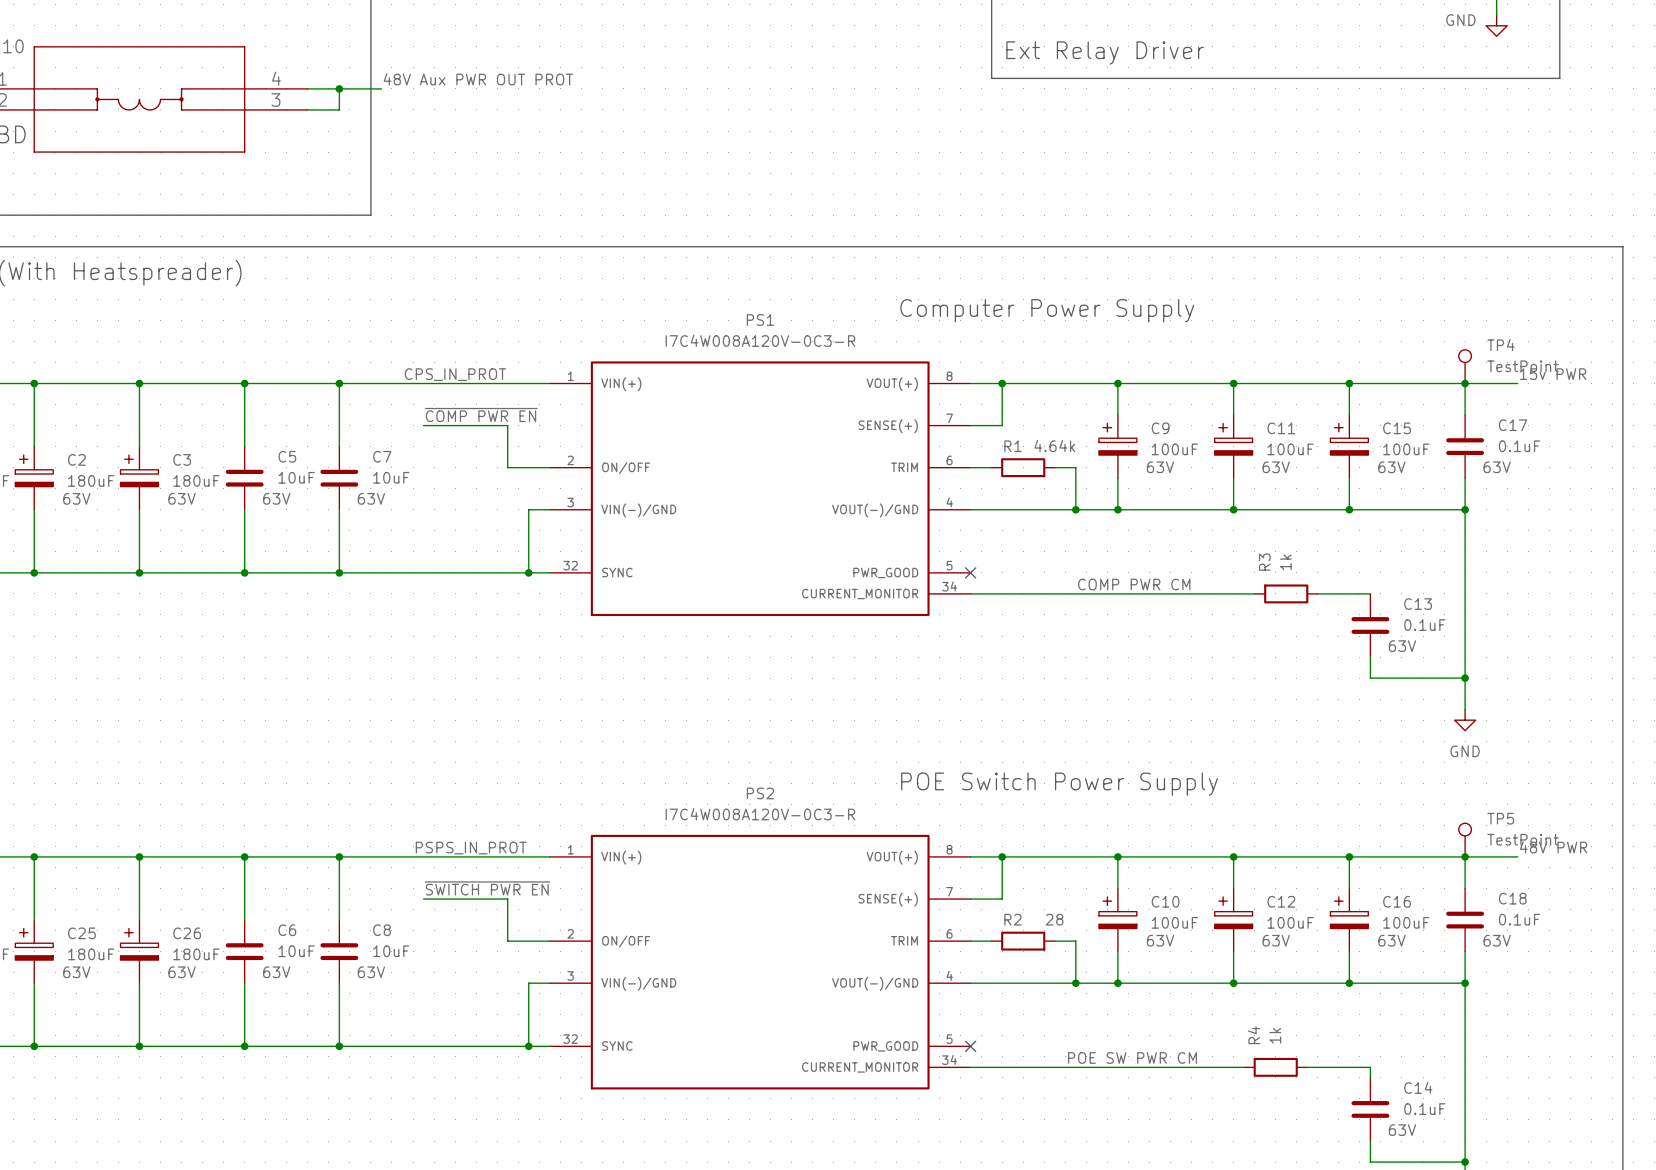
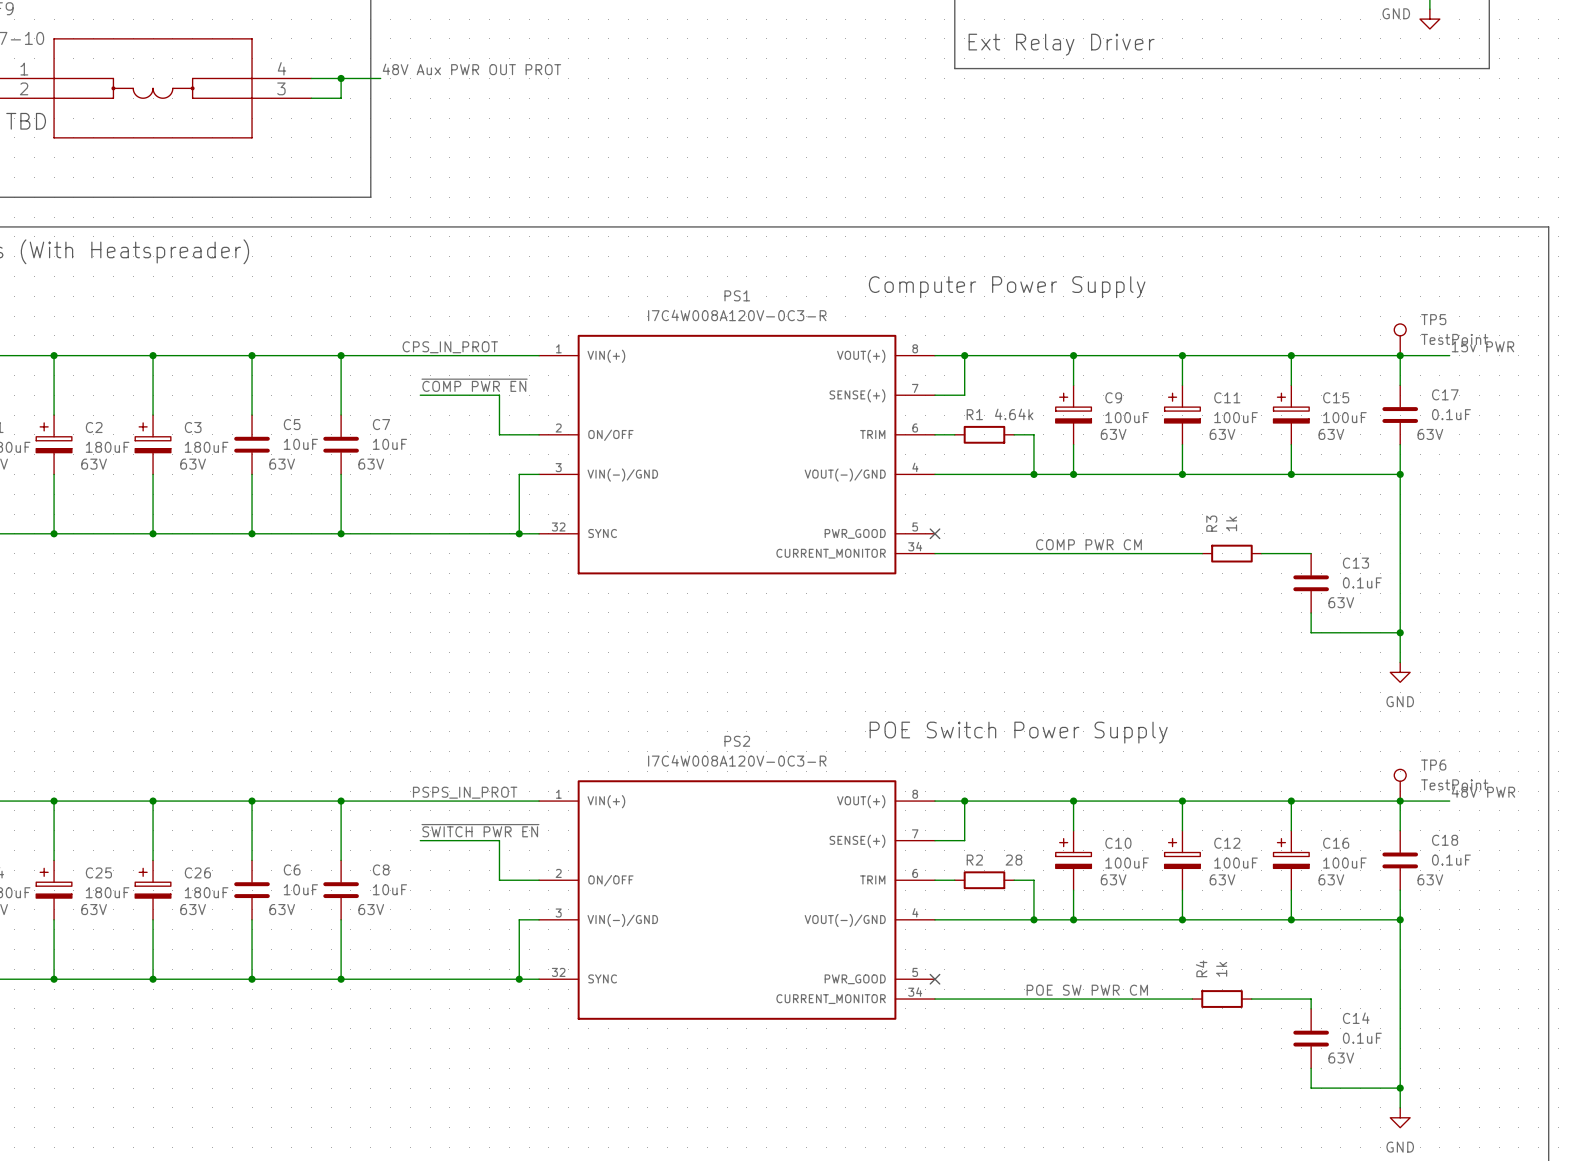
TP4 name: TP4 (1500, 344) -> TP5 (1433, 319)
TP5 name: TP5 (1500, 818) -> TP6 (1433, 765)

